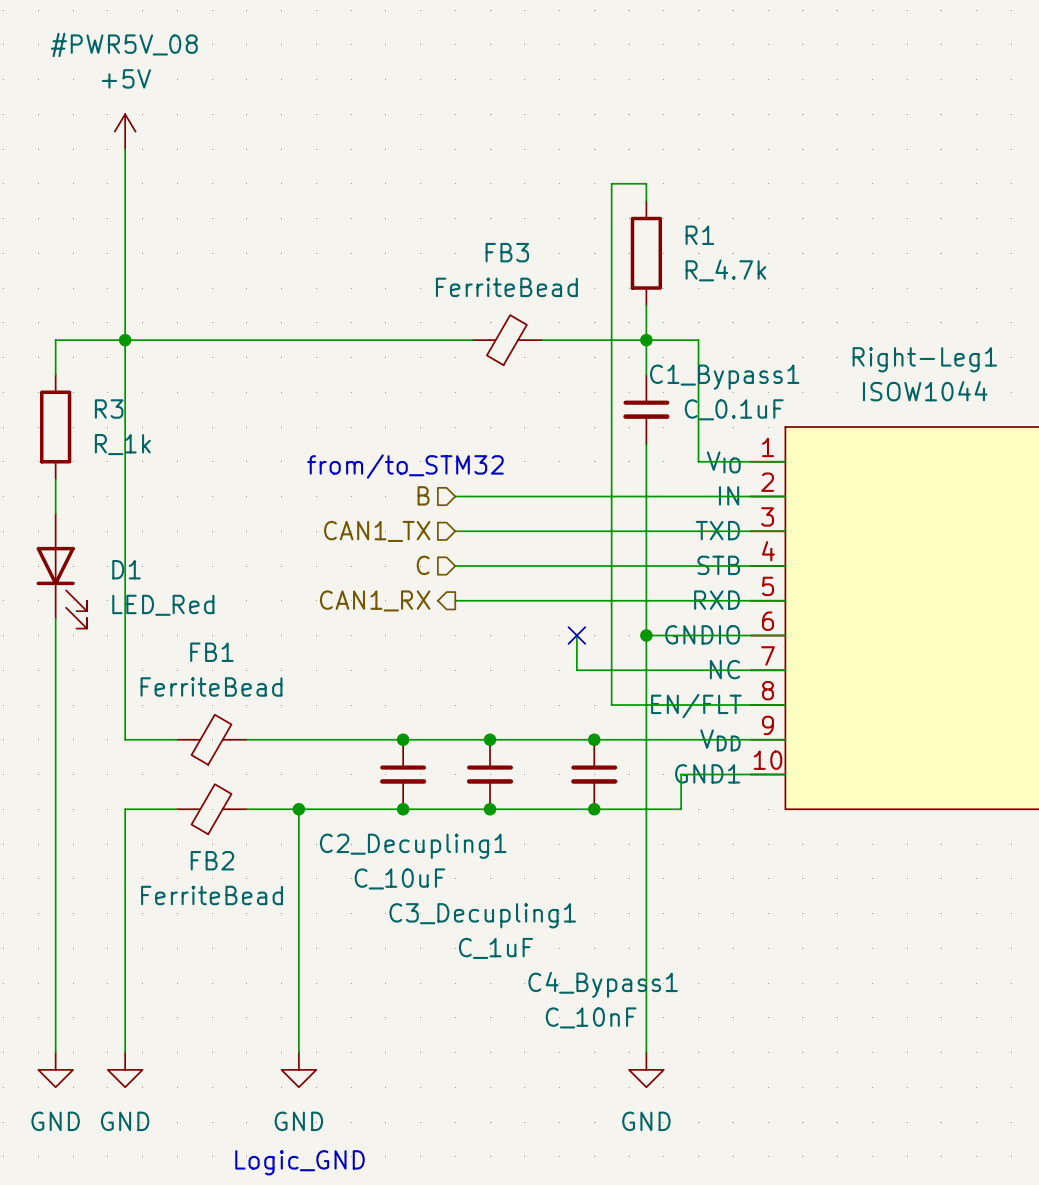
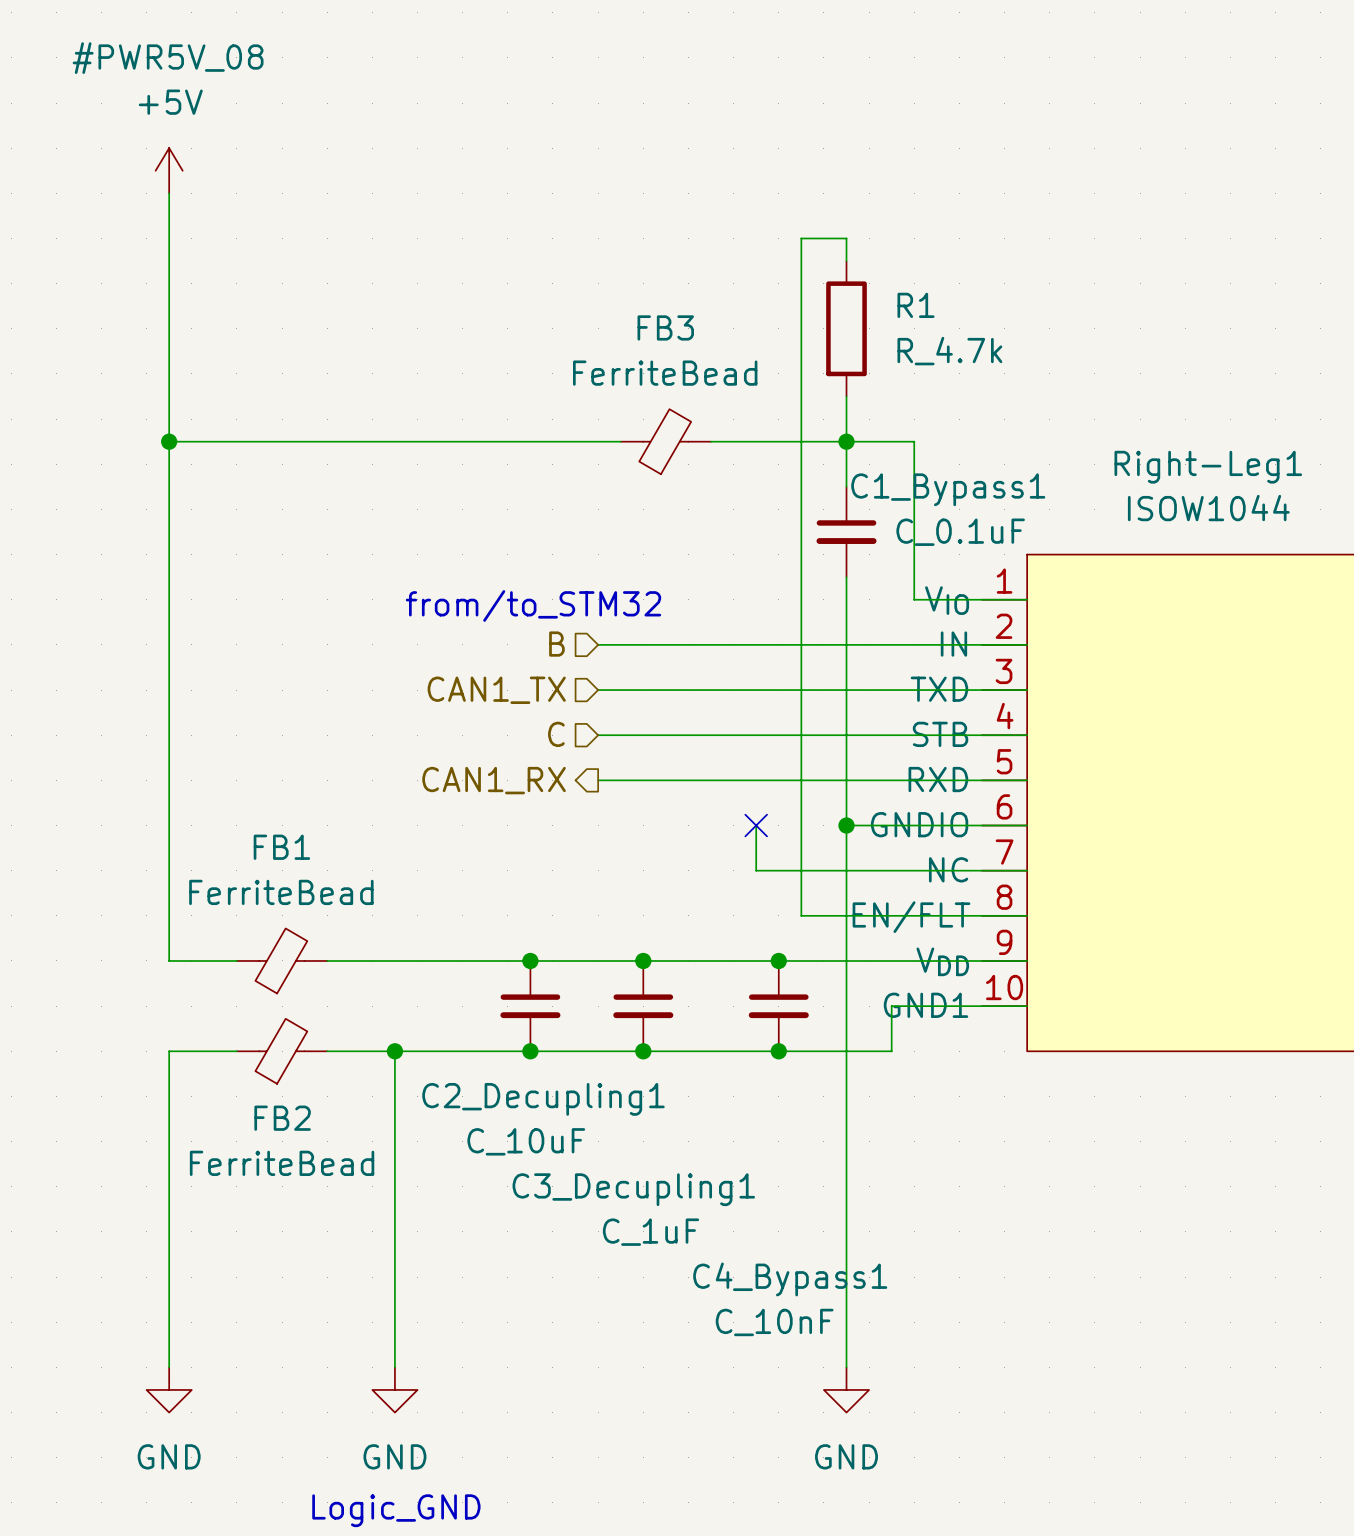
wire: (125, 340) (55, 340) (55, 374) -> none
R3: R_1k (55, 427) -> none
wire: (55, 479) (55, 513) -> none
D1: LED_Red (61, 571) -> none
wire: (55, 618) (55, 1052) -> none
power symbol: GND (55, 1069) -> none

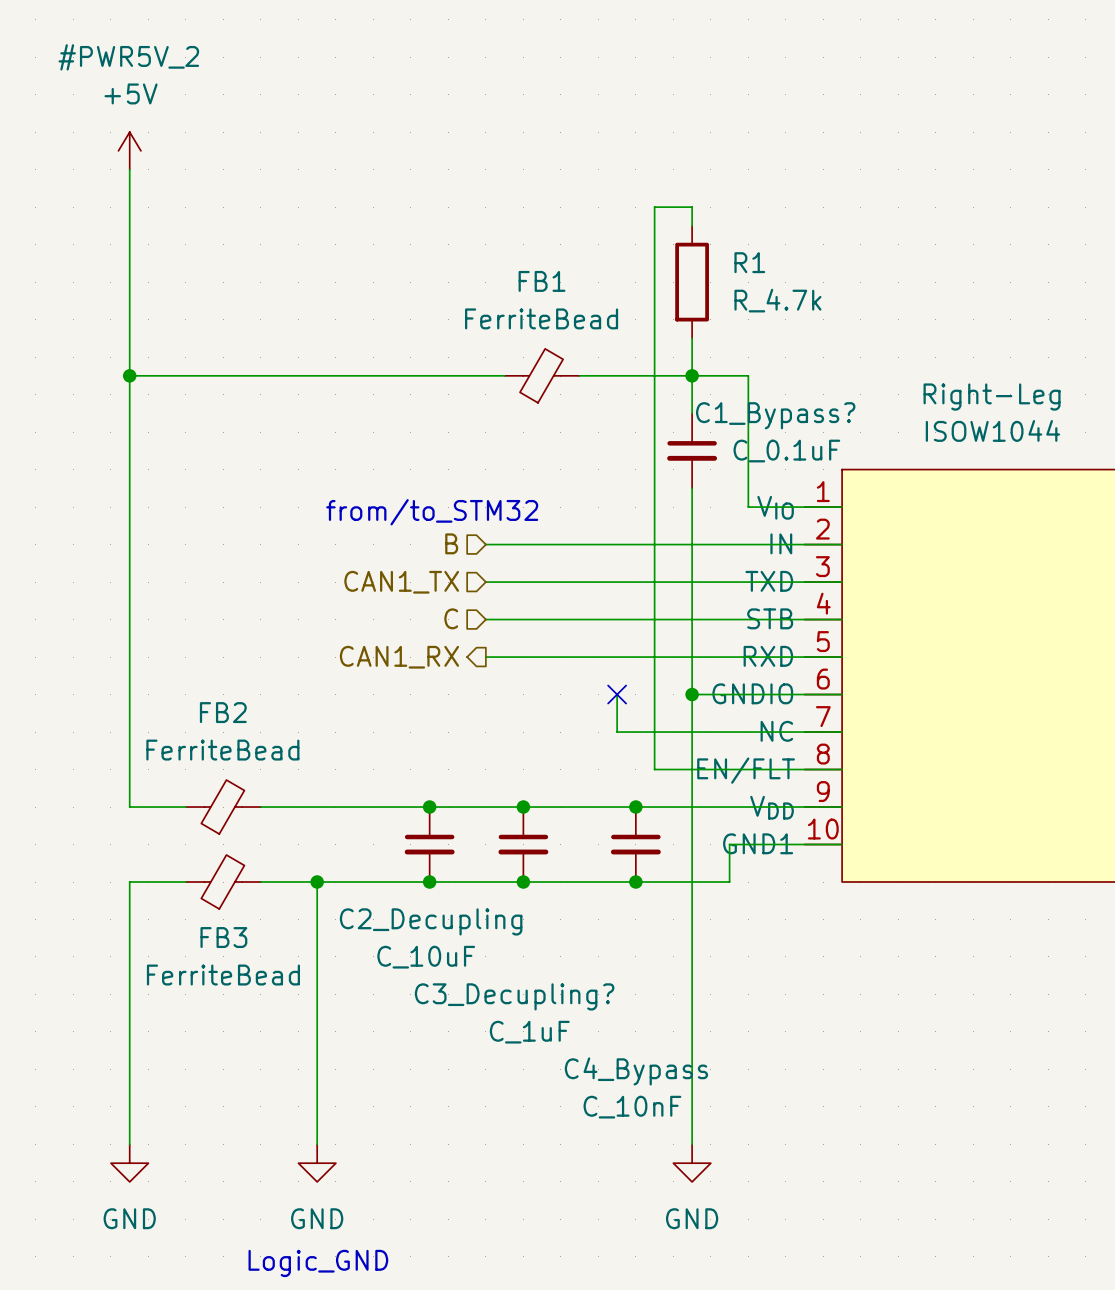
#PWR5V_08 name: #PWR5V_08 (168, 58) -> #PWR5V_2 (128, 57)
FB3 name: FB3 (665, 327) -> FB1 (542, 281)
Right-Leg1 name: Right-Leg1 (1208, 467) -> Right-Leg (992, 397)
C1_Bypass1 name: C1_Bypass1 (948, 489) -> C1_Bypass? (775, 415)
FB1 name: FB1 (281, 847) -> FB2 (223, 712)
C2_Decupling1 name: C2_Decupling1 (543, 1099) -> C2_Decupling (431, 921)
FB2 name: FB2 (282, 1118) -> FB3 (223, 937)
C3_Decupling1 name: C3_Decupling1 (633, 1189) -> C3_Decupling? (514, 996)
C4_Bypass1 name: C4_Bypass1 (790, 1279) -> C4_Bypass (636, 1071)

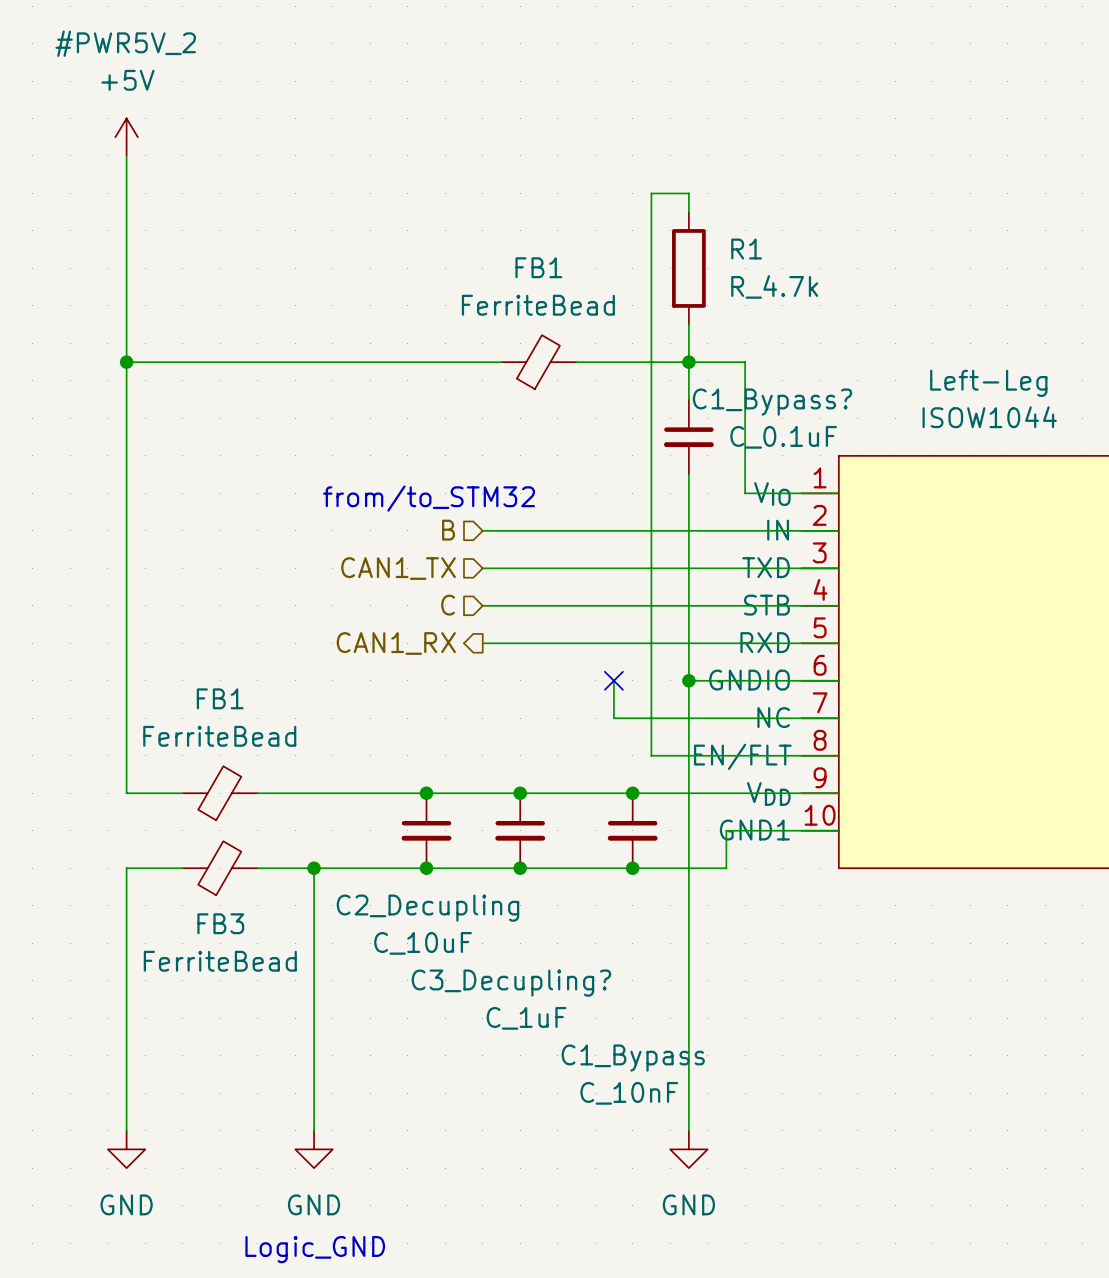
Right-Leg name: Right-Leg (992, 397) -> Left-Leg (988, 383)
FB2 name: FB2 (223, 712) -> FB1 (220, 698)
C4_Bypass name: C4_Bypass (636, 1071) -> C1_Bypass (633, 1058)

